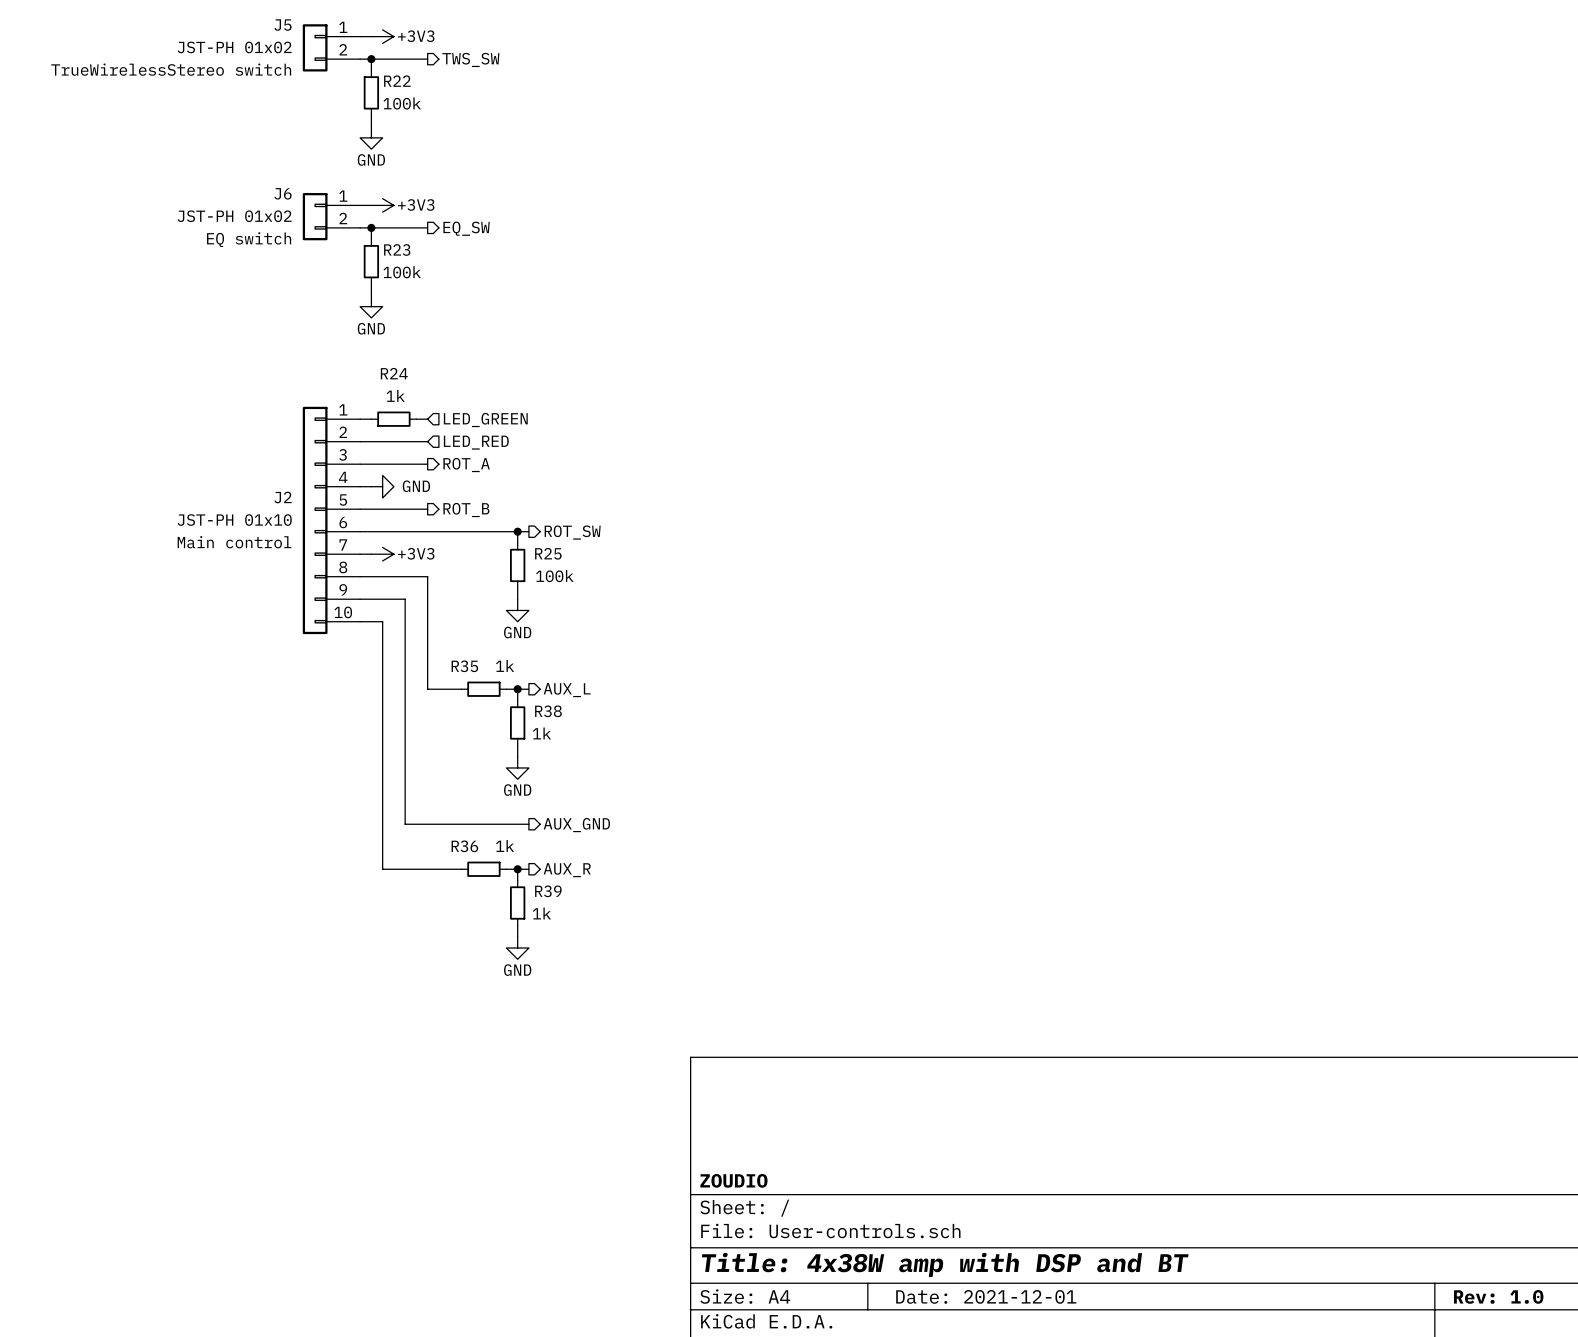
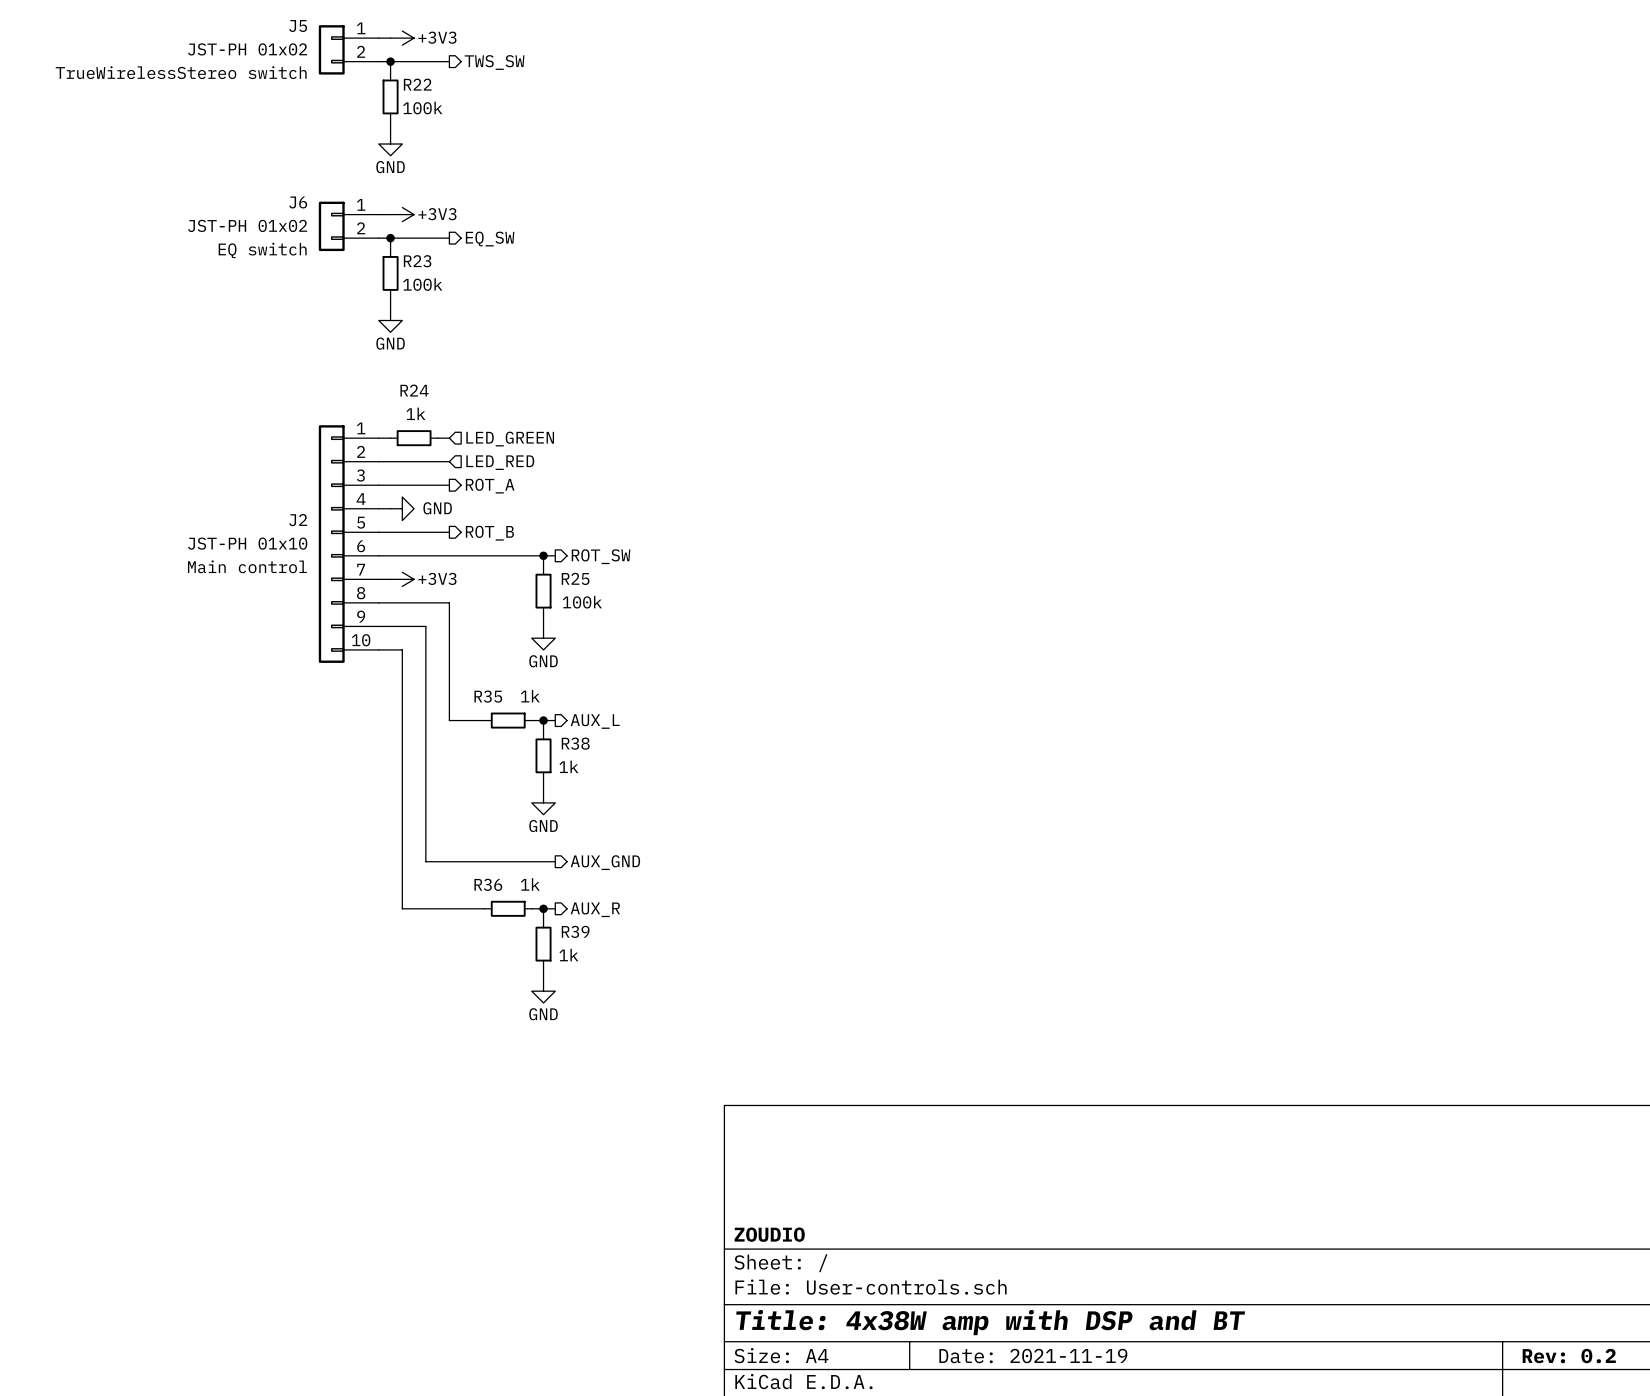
title block: Date: 2021-12-01 (986, 1296) -> Date: 2021-11-19 (1033, 1356)
title block: Rev: 1.0 (1498, 1296) -> Rev: 0.2 (1569, 1356)

